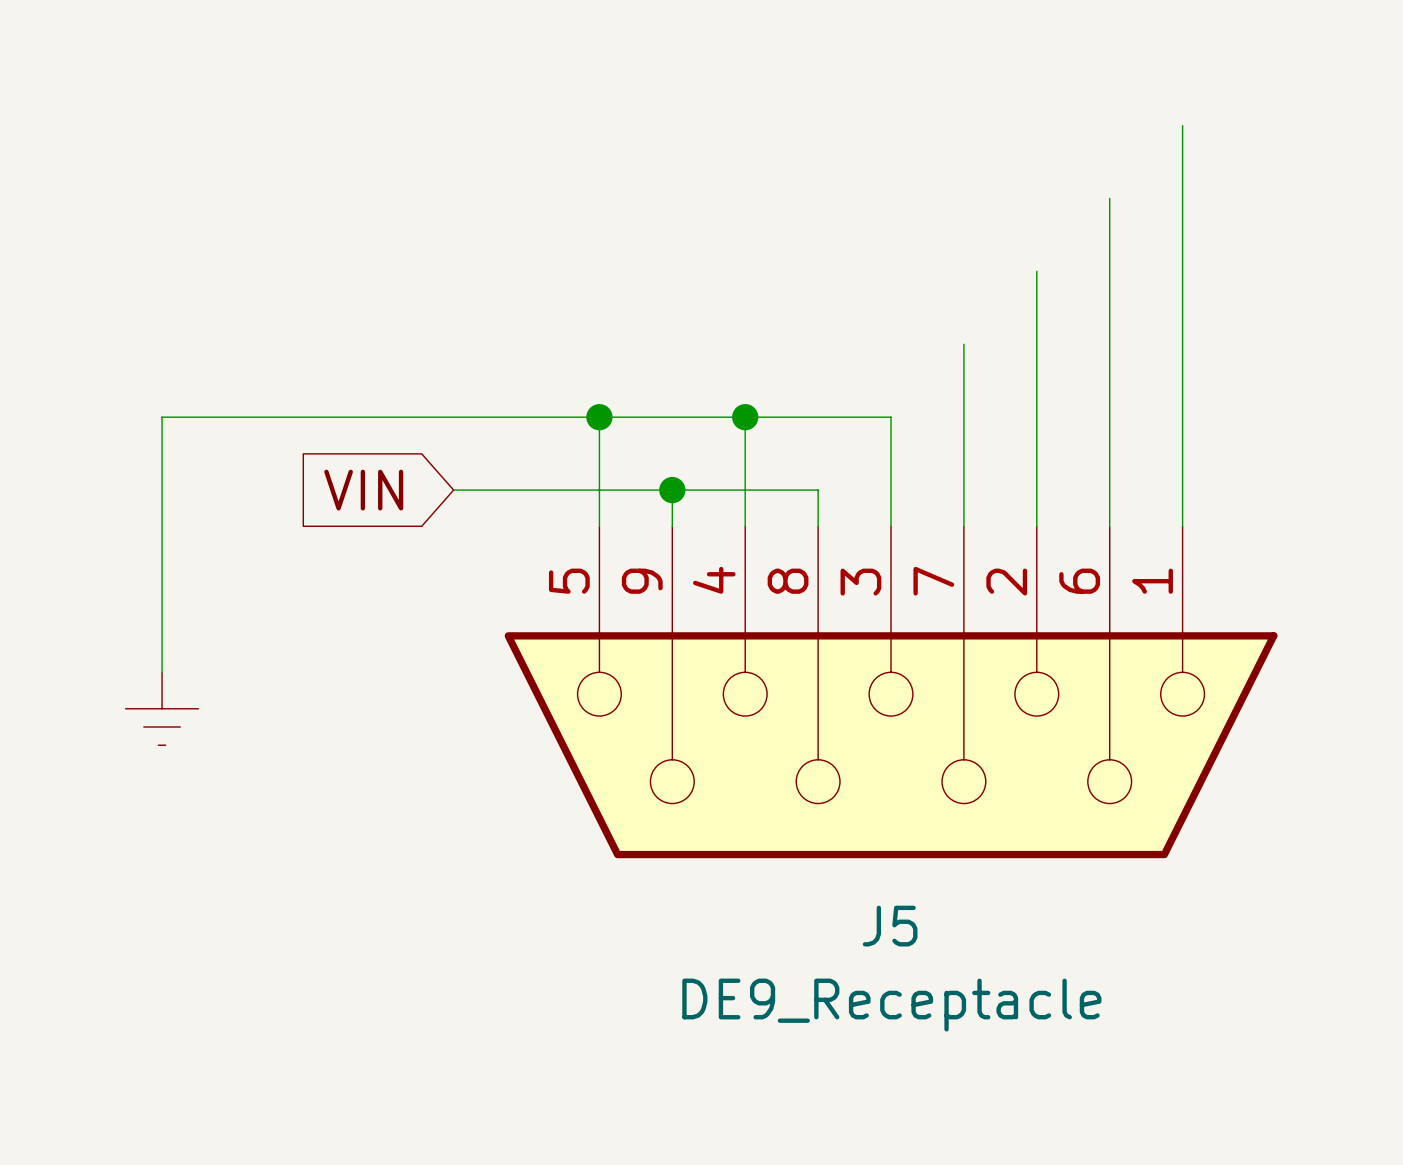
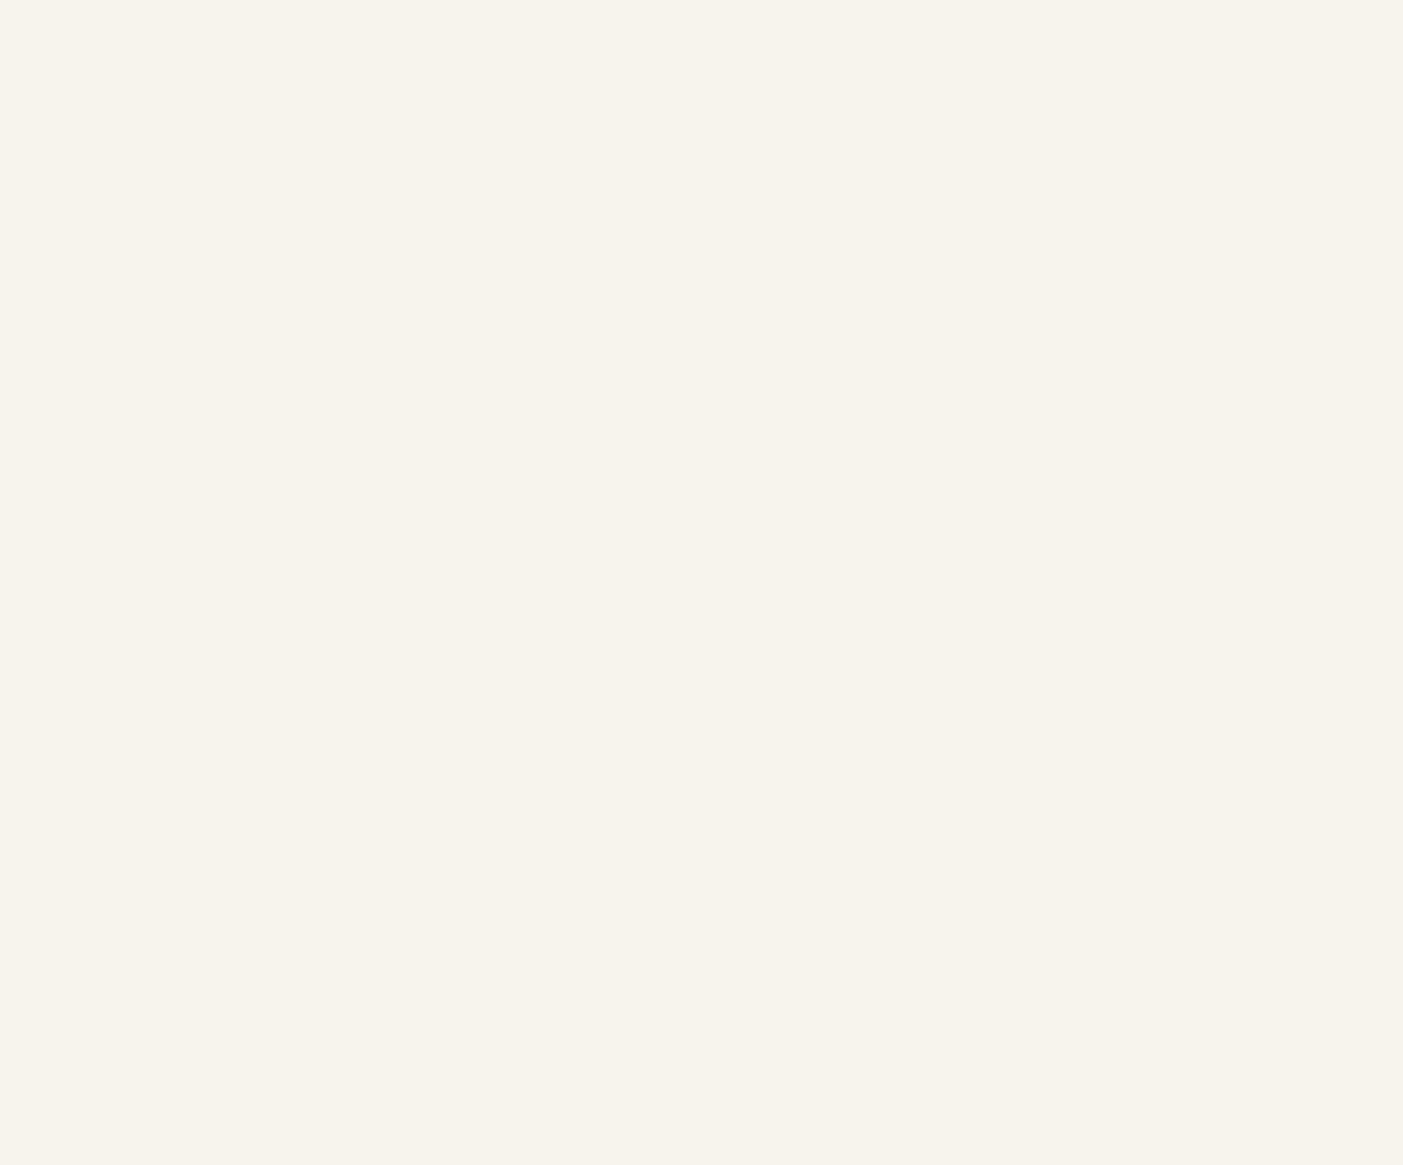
wire: (1182, 125) (1182, 526) -> none
wire: (1109, 198) (1109, 526) -> none
wire: (1036, 271) (1036, 526) -> none
wire: (963, 344) (963, 526) -> none
wire: (599, 417) (599, 526) -> none
junction: (599, 417) -> none
wire: (745, 417) (745, 526) -> none
junction: (745, 417) -> none
global label: VIN (363, 490) -> none
wire: (453, 490) (818, 490) (818, 526) -> none
wire: (672, 490) (672, 526) -> none
junction: (672, 490) -> none
wire: (891, 526) (891, 417) (162, 417) (162, 672) -> none
J5: DE9_Receptacle (891, 692) -> none
power symbol: (162, 708) -> none

